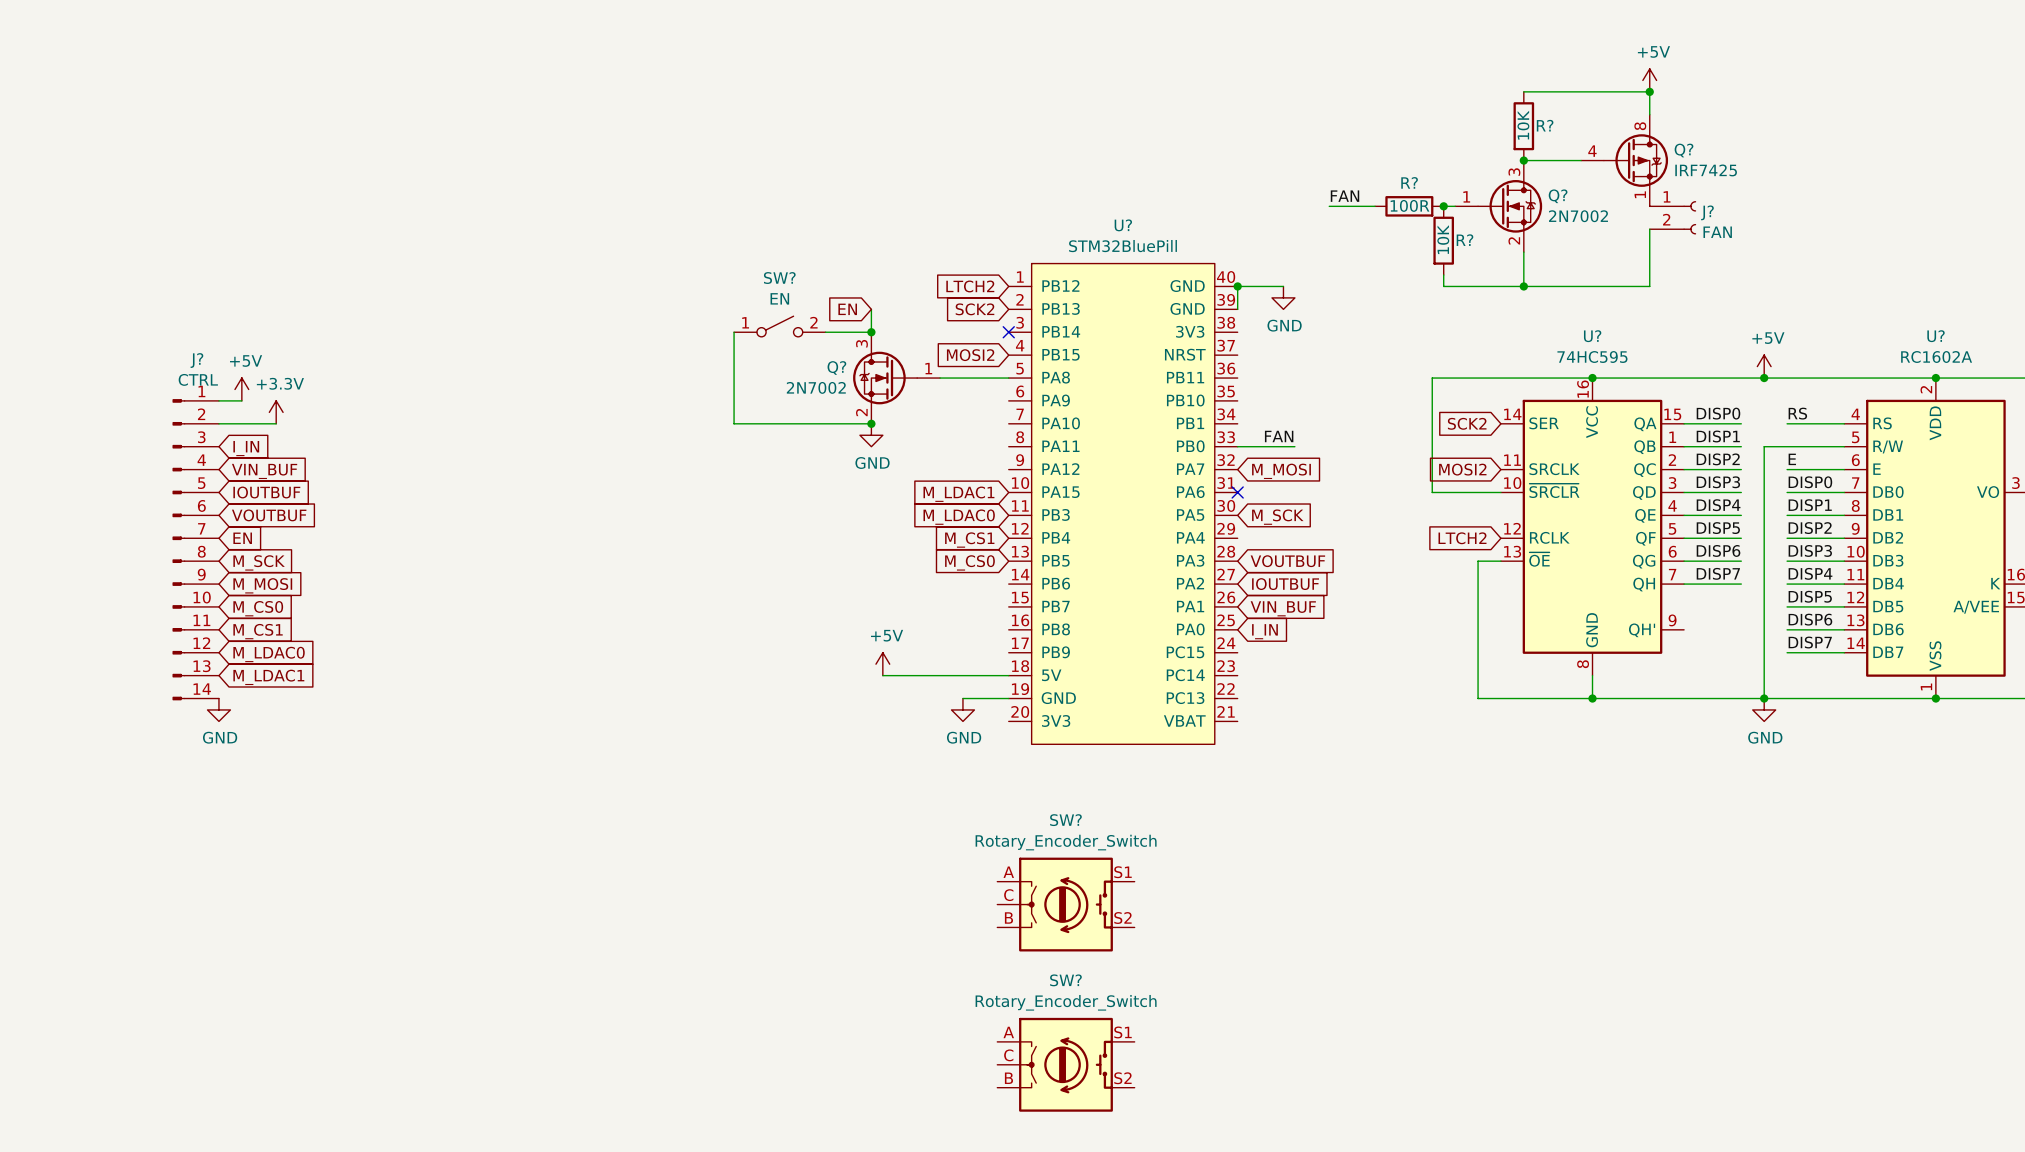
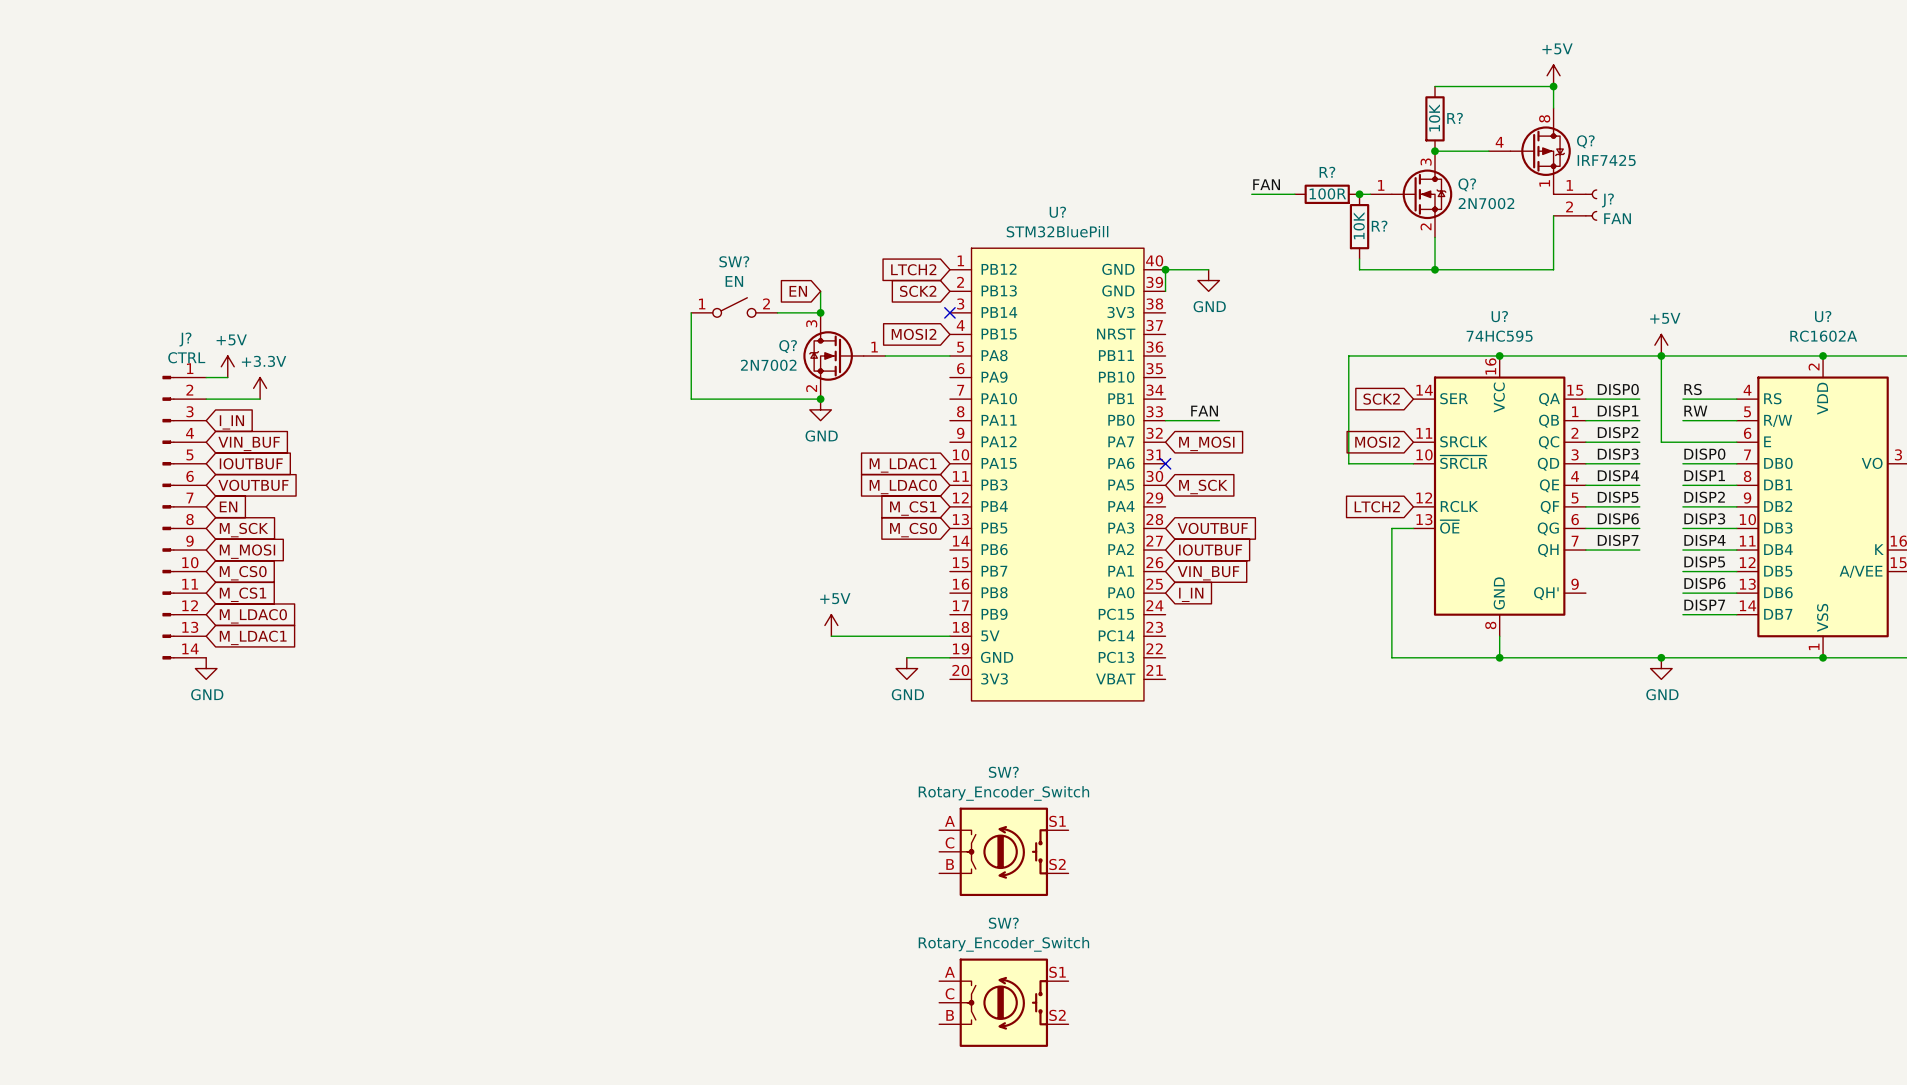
label: none -> RW (1695, 411)
wire: (1764, 446) (1787, 446) -> (1661, 420) (1661, 355)
label: E (1792, 459) -> none
wire: (1764, 469) (1764, 698) -> (1661, 442) (1682, 442)

